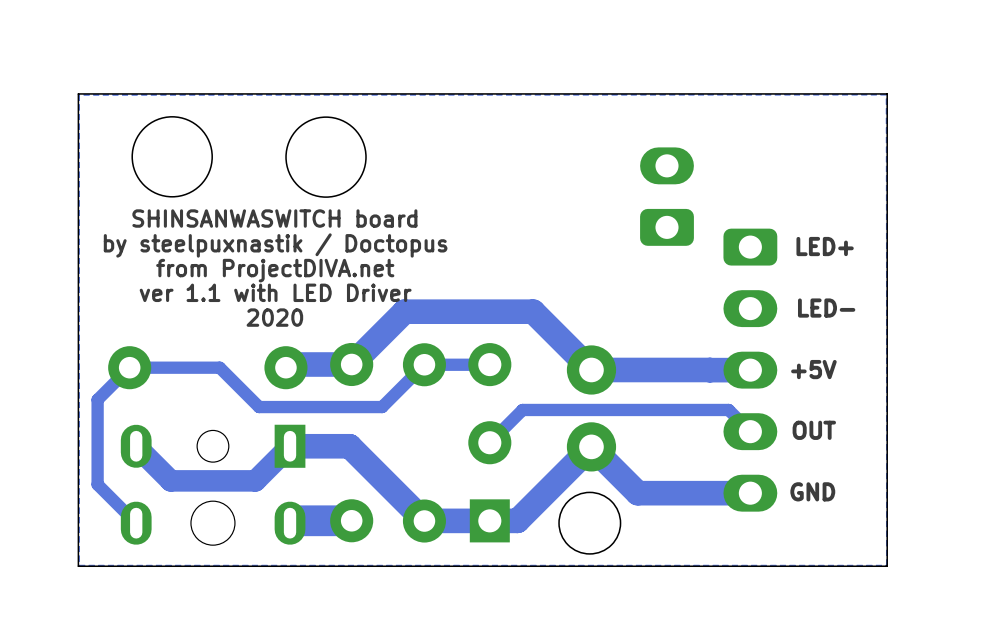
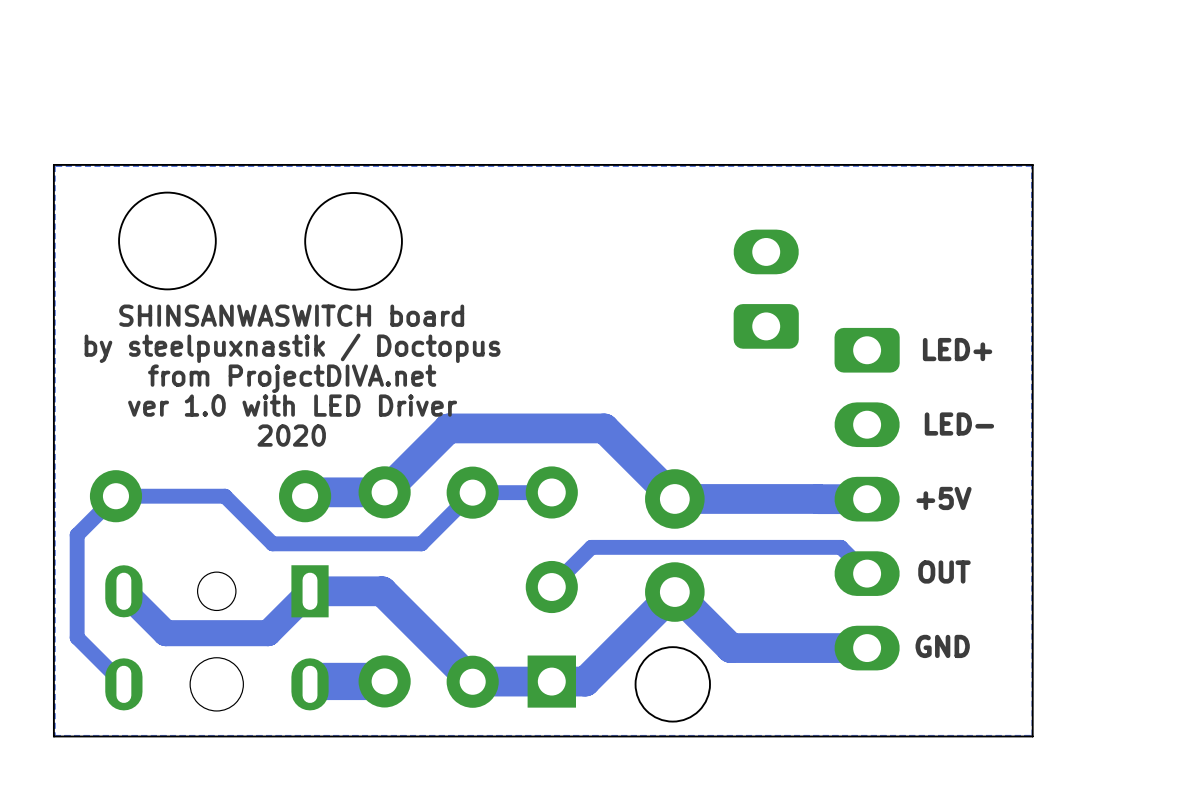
text: ver 1.1 with LED Driver (275, 292) -> ver 1.0 with LED Driver (292, 405)

